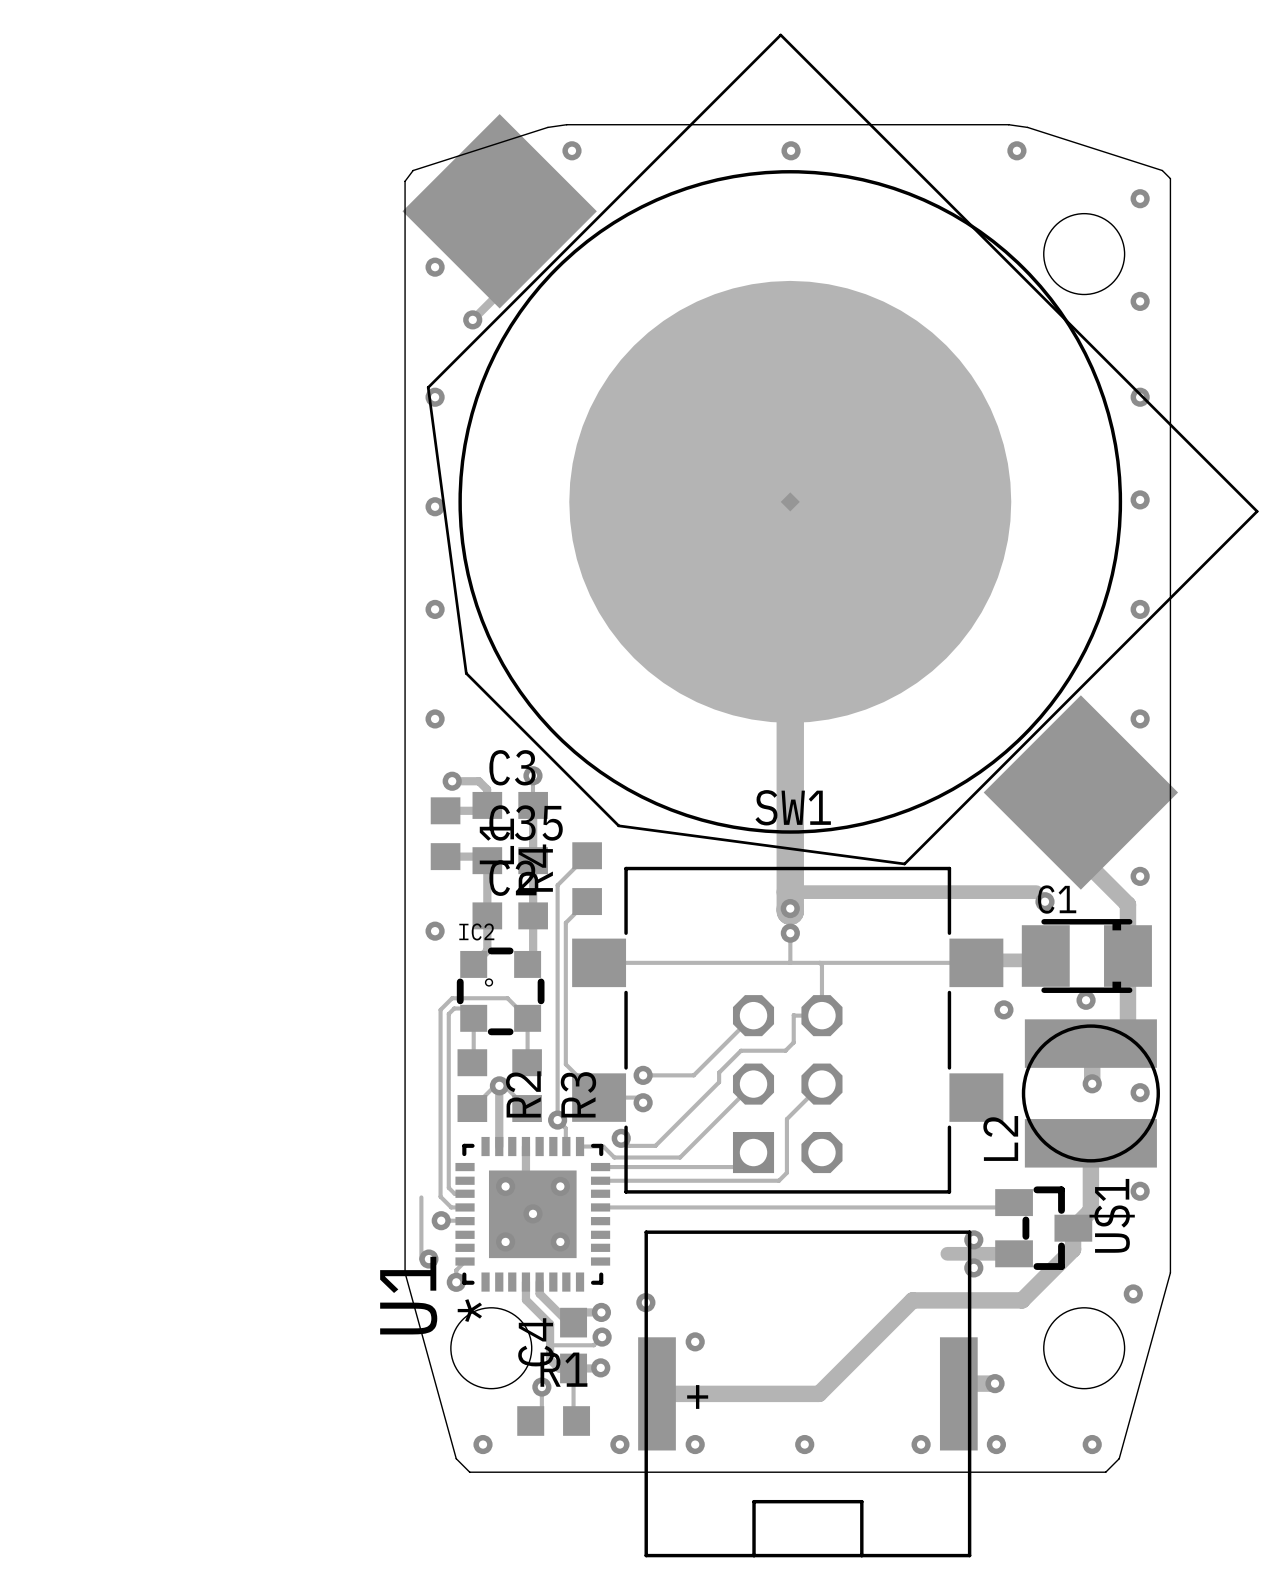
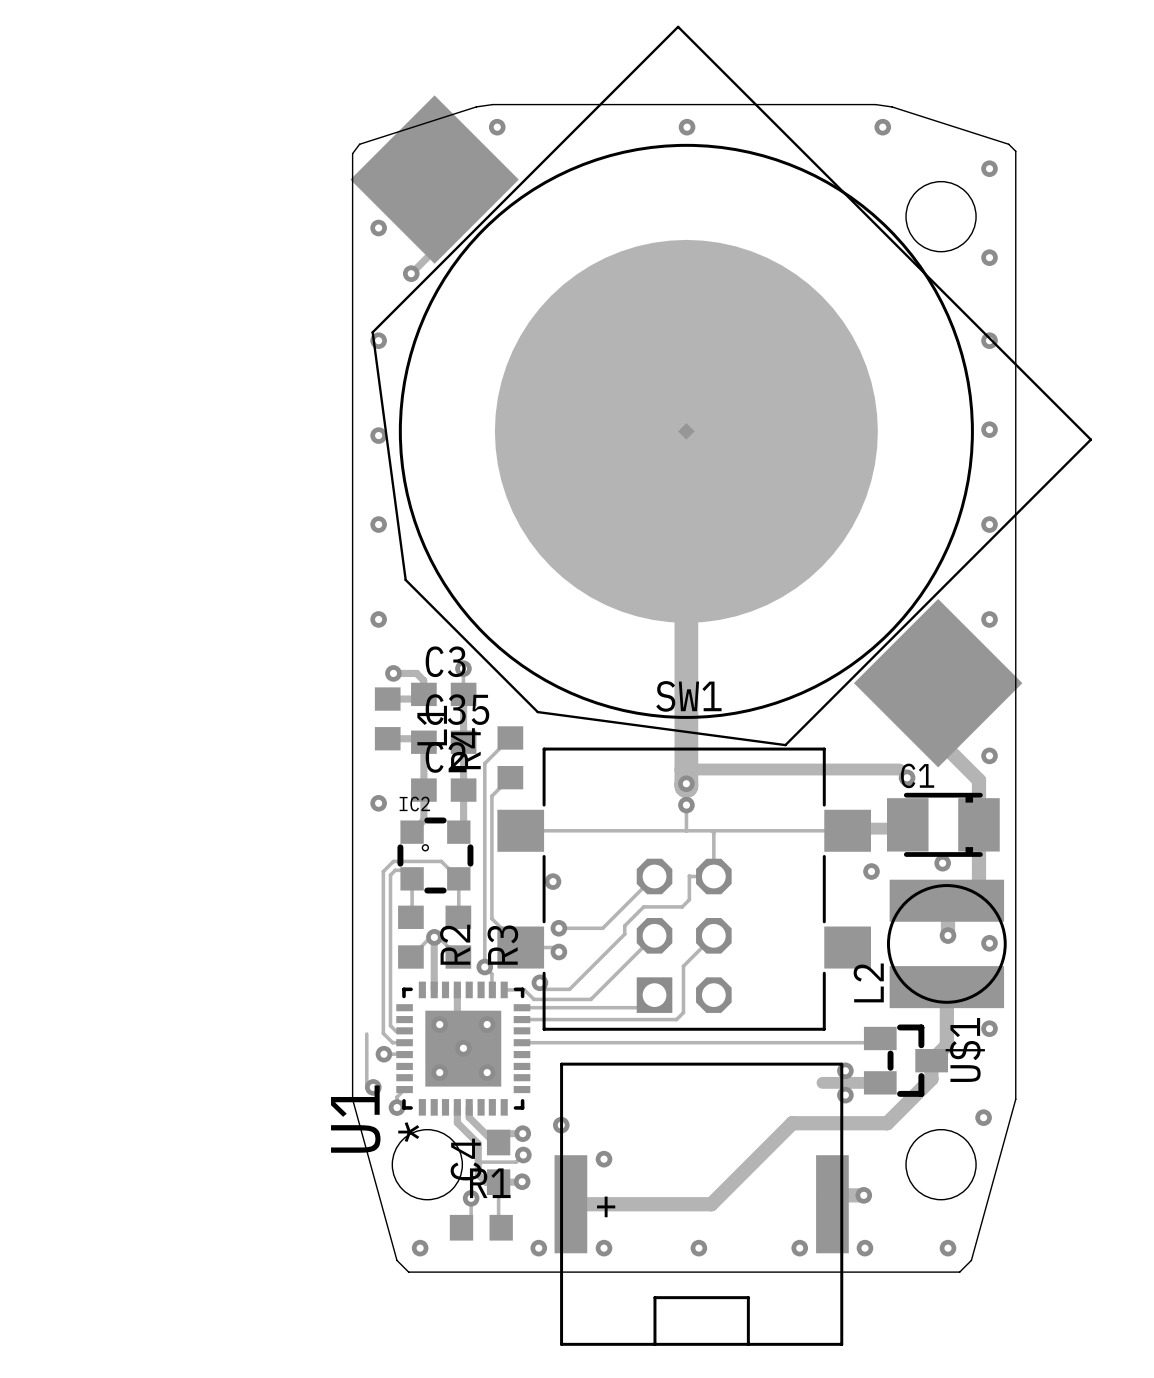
via: none -> (553, 881)

